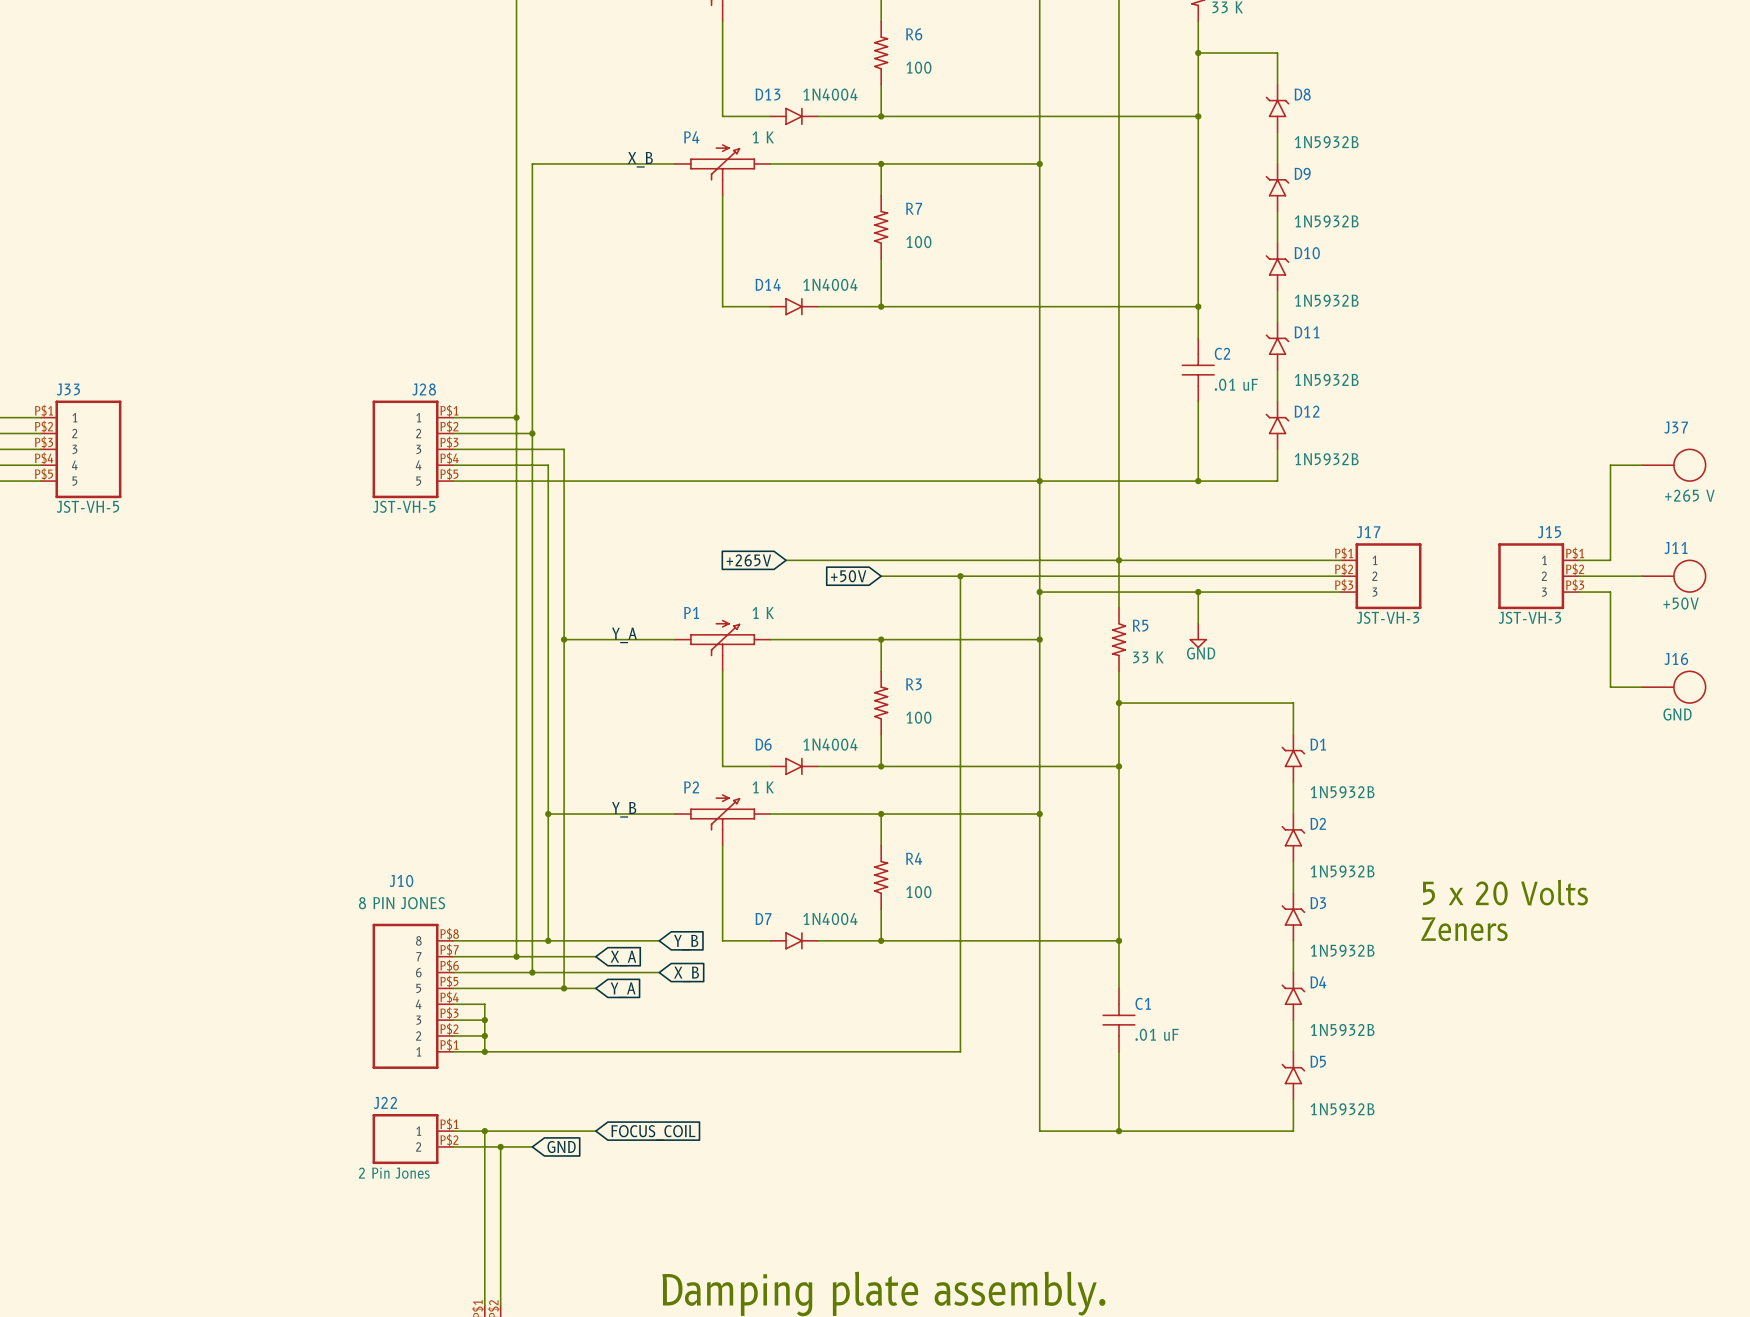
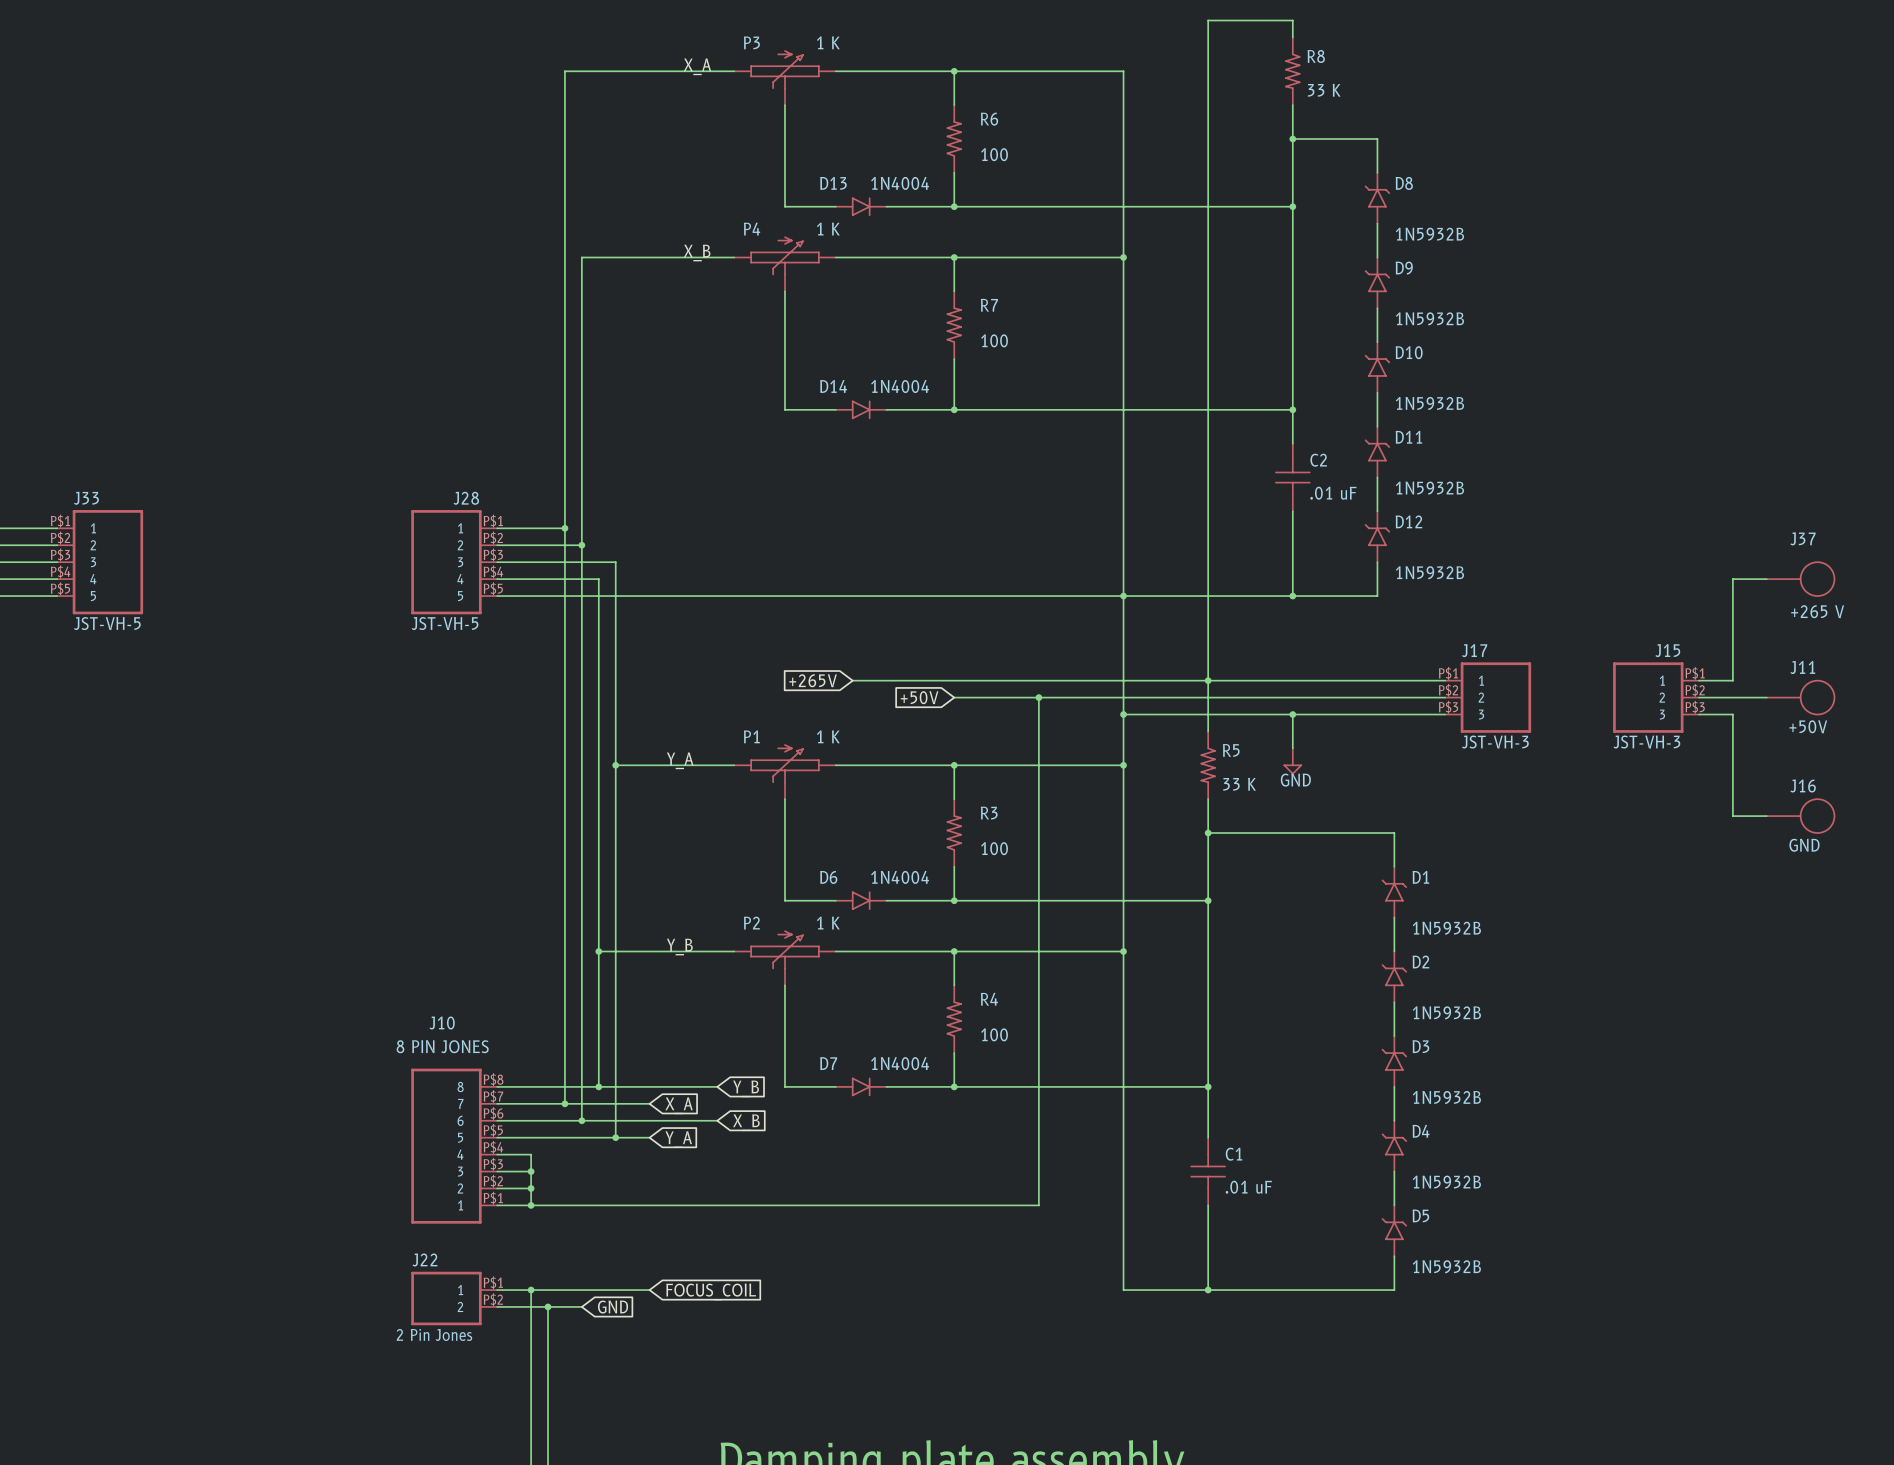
text: 5 x 20 Volts (1505, 892) -> none
text: Zeners (1464, 929) -> none

